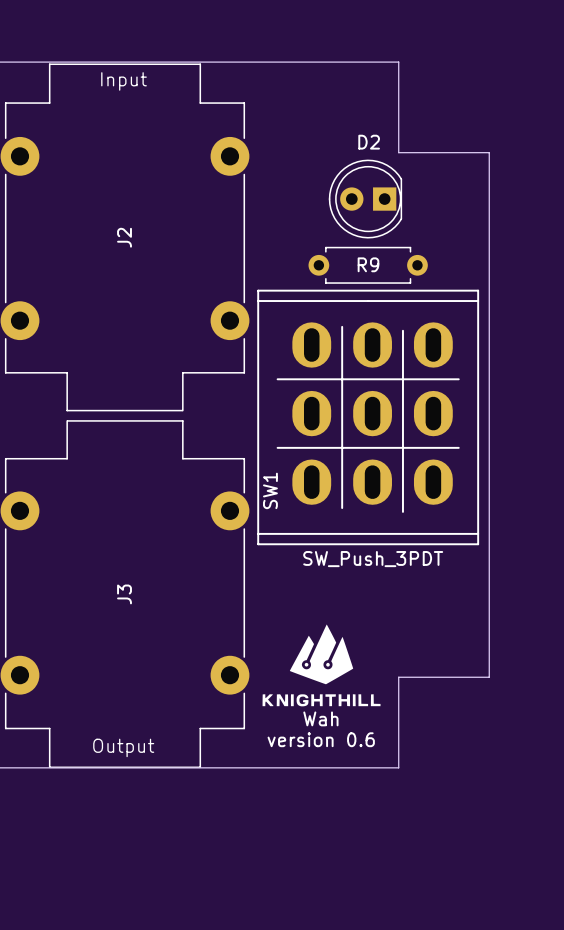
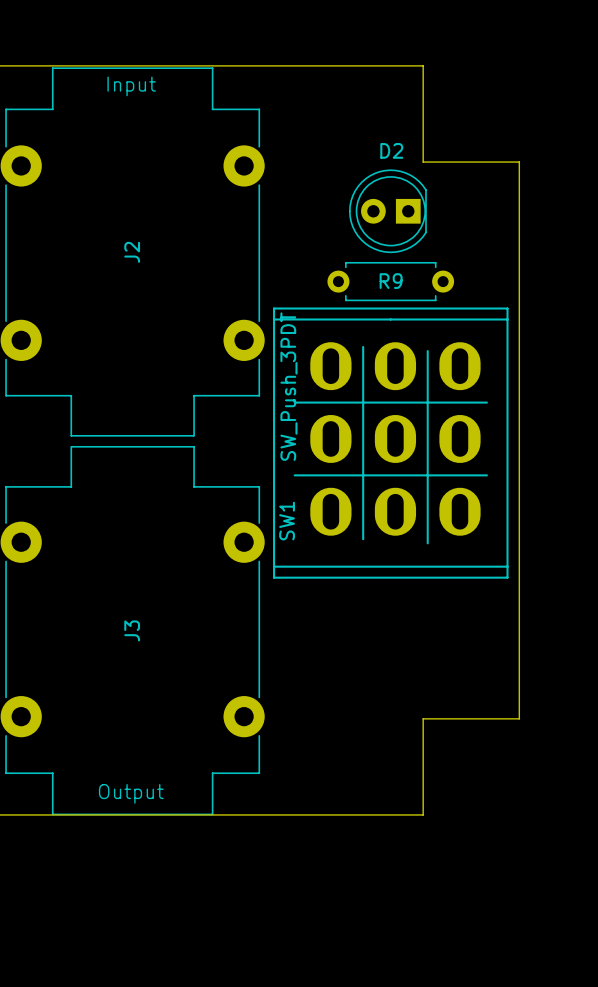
SW1 value rotation: 0° (373, 559) -> 90° counterclockwise (288, 386)
SW1 value position: SW_Push_3PDT (373, 559) -> SW_Push_3PDT (288, 386)
drawing: [262, 624, 381, 707] -> none
text: Wah (320, 718) -> none
text: version 0.6 (321, 739) -> none

